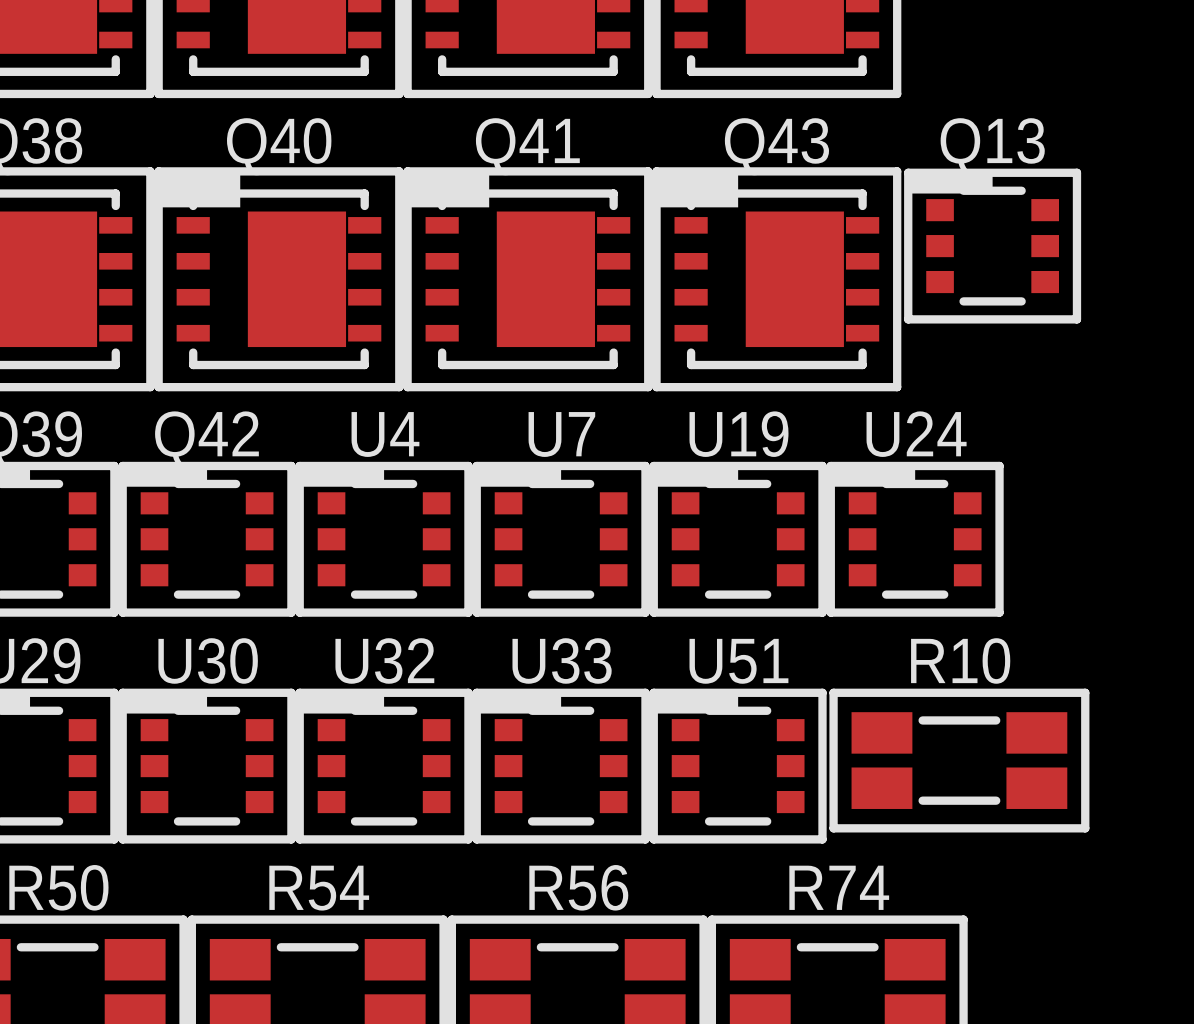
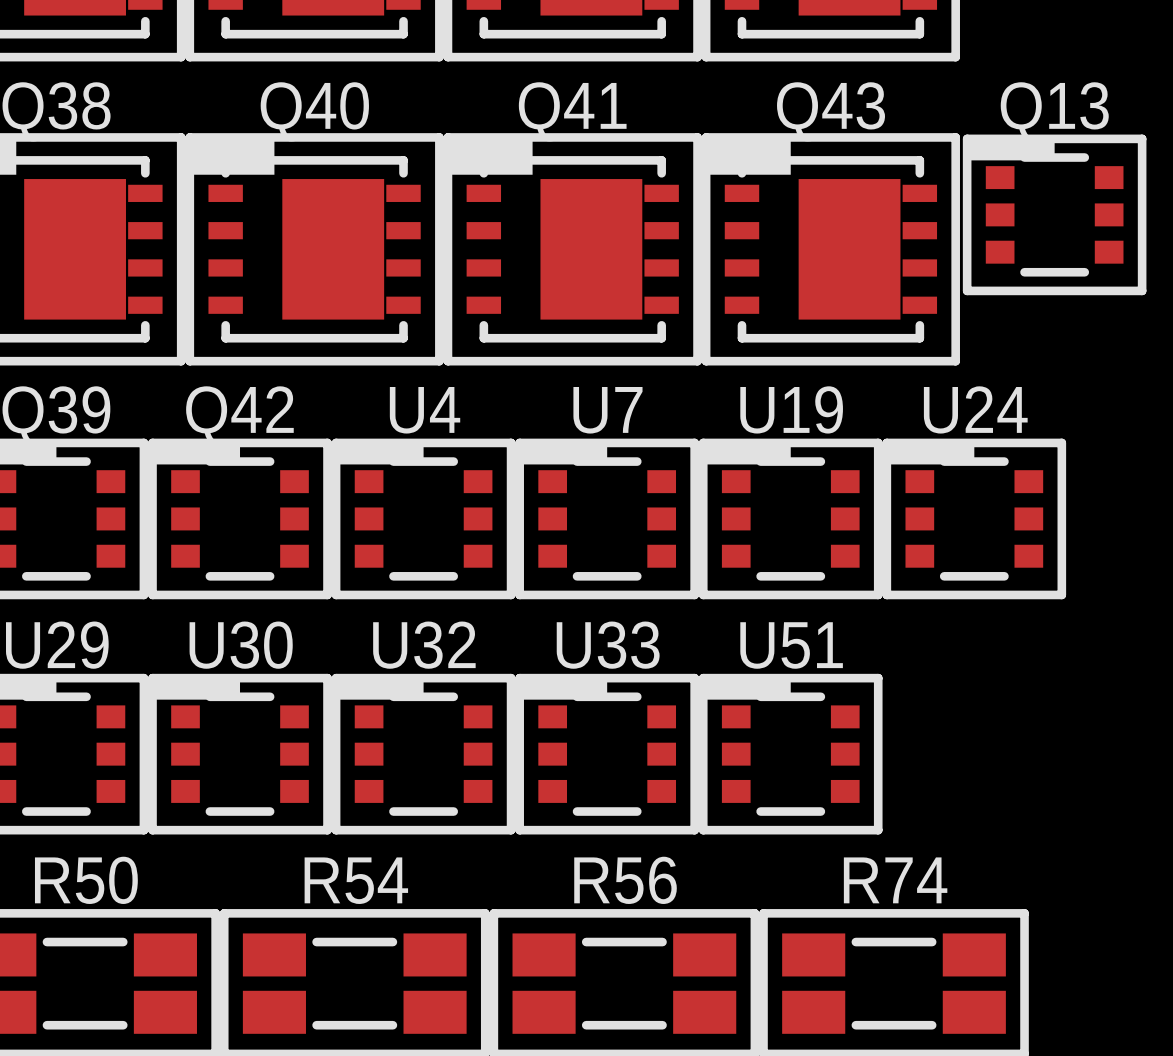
R10: (959, 760) -> none

